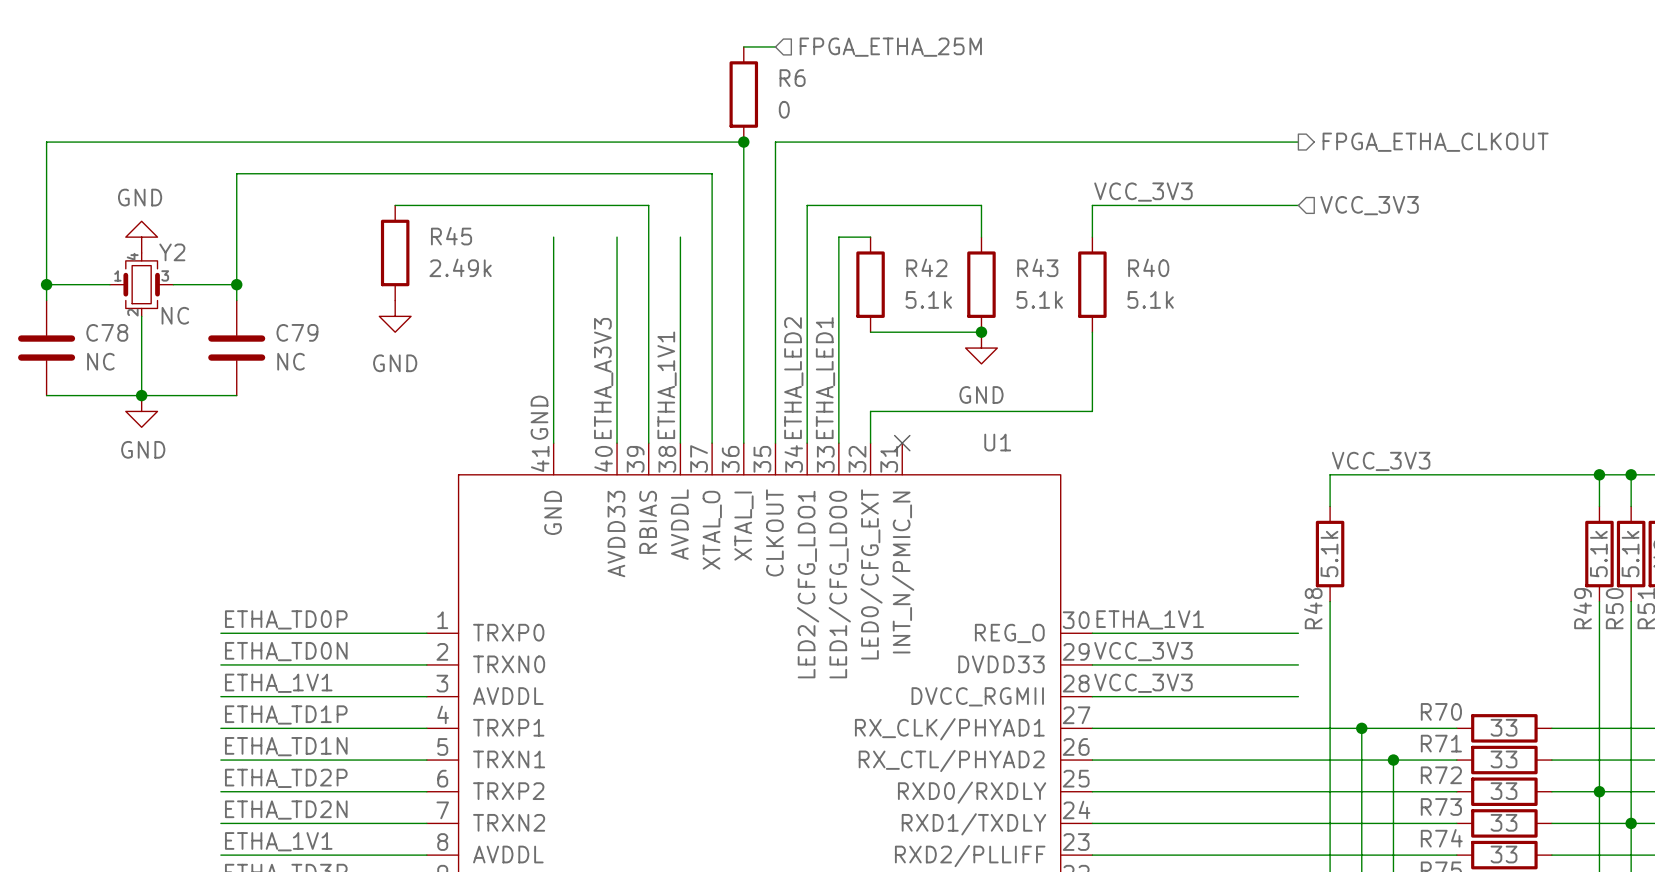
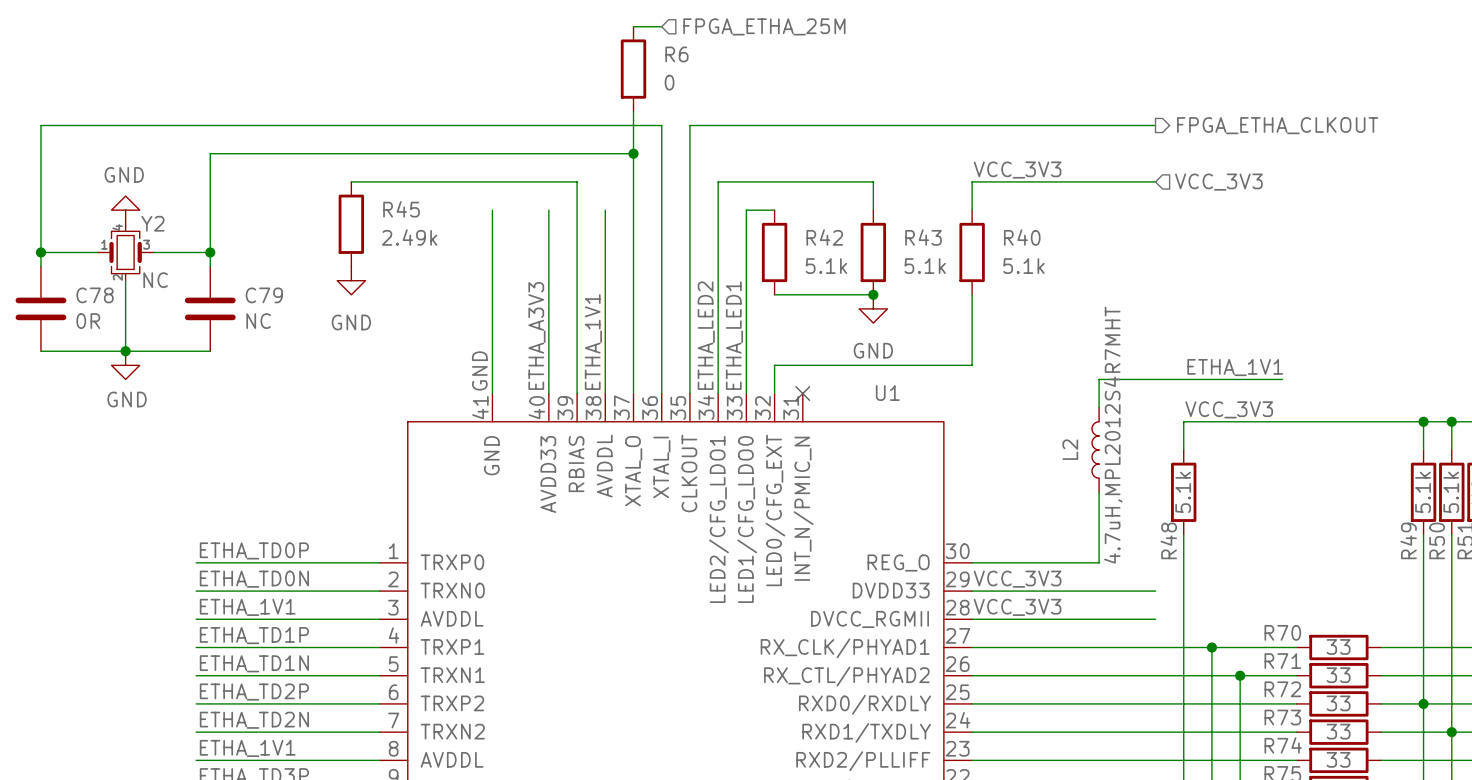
wire: (743, 46) (775, 46) -> (633, 26) (661, 26)
hierarchical label position: FPGA_ETHA_25M (890, 47) -> FPGA_ETHA_25M (764, 26)
R6 position: (743, 94) -> (633, 69)
wire: none -> (633, 111) (633, 153)
junction position: (743, 142) -> (633, 153)
C78 value: NC (100, 361) -> 0R (88, 321)
label: none -> ETHA_1V1 (1235, 367)
wire: none -> (1282, 379) (1099, 379) (1099, 407)
L2: none -> 4.7uH,MPL2012S4R7MHT (1095, 449)
label: ETHA_1V1 (1150, 619) -> none
wire: (1235, 633) (1298, 633) -> (1099, 562) (1099, 492)

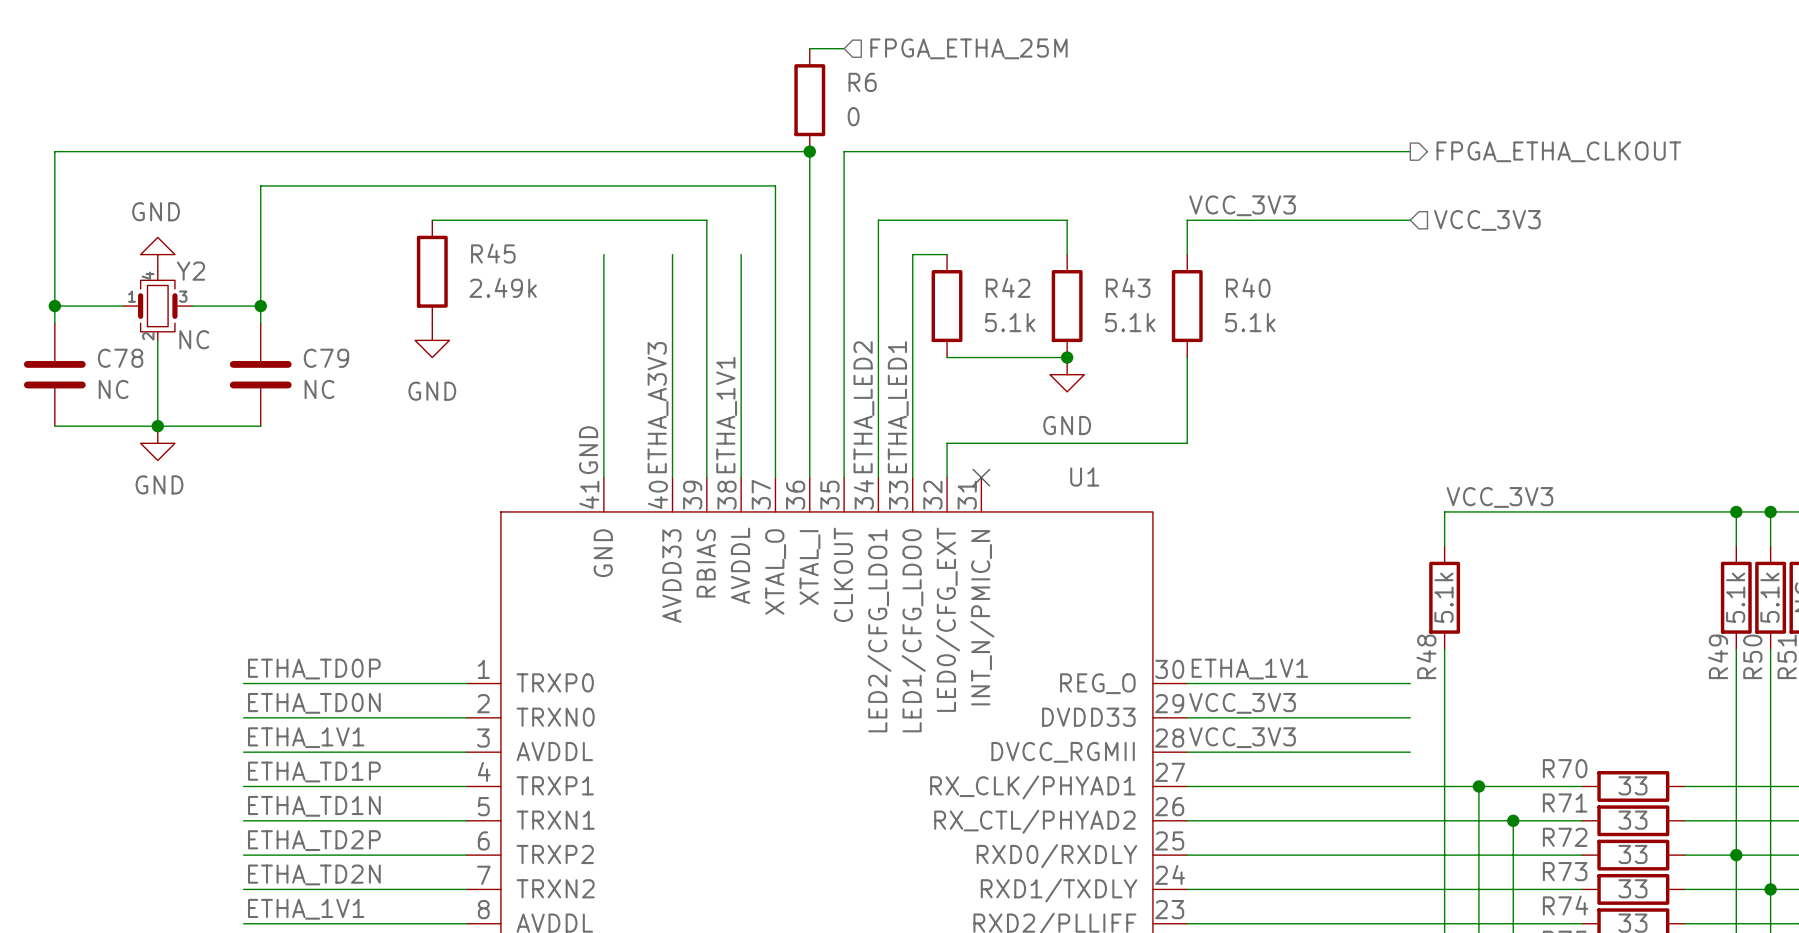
wire: (633, 26) (661, 26) -> (809, 48) (844, 48)
hierarchical label position: FPGA_ETHA_25M (764, 26) -> FPGA_ETHA_25M (968, 48)
R6 position: (633, 69) -> (809, 100)
wire: (633, 111) (633, 153) -> none
junction position: (633, 153) -> (809, 151)
C78 value: 0R (88, 321) -> NC (113, 389)
label: ETHA_1V1 (1235, 367) -> none
wire: (1282, 379) (1099, 379) (1099, 407) -> none
L2: 4.7uH,MPL2012S4R7MHT (1095, 449) -> none
wire: (1099, 492) (1099, 562) -> (1410, 683) (1341, 683)
label: none -> ETHA_1V1 (1249, 669)

